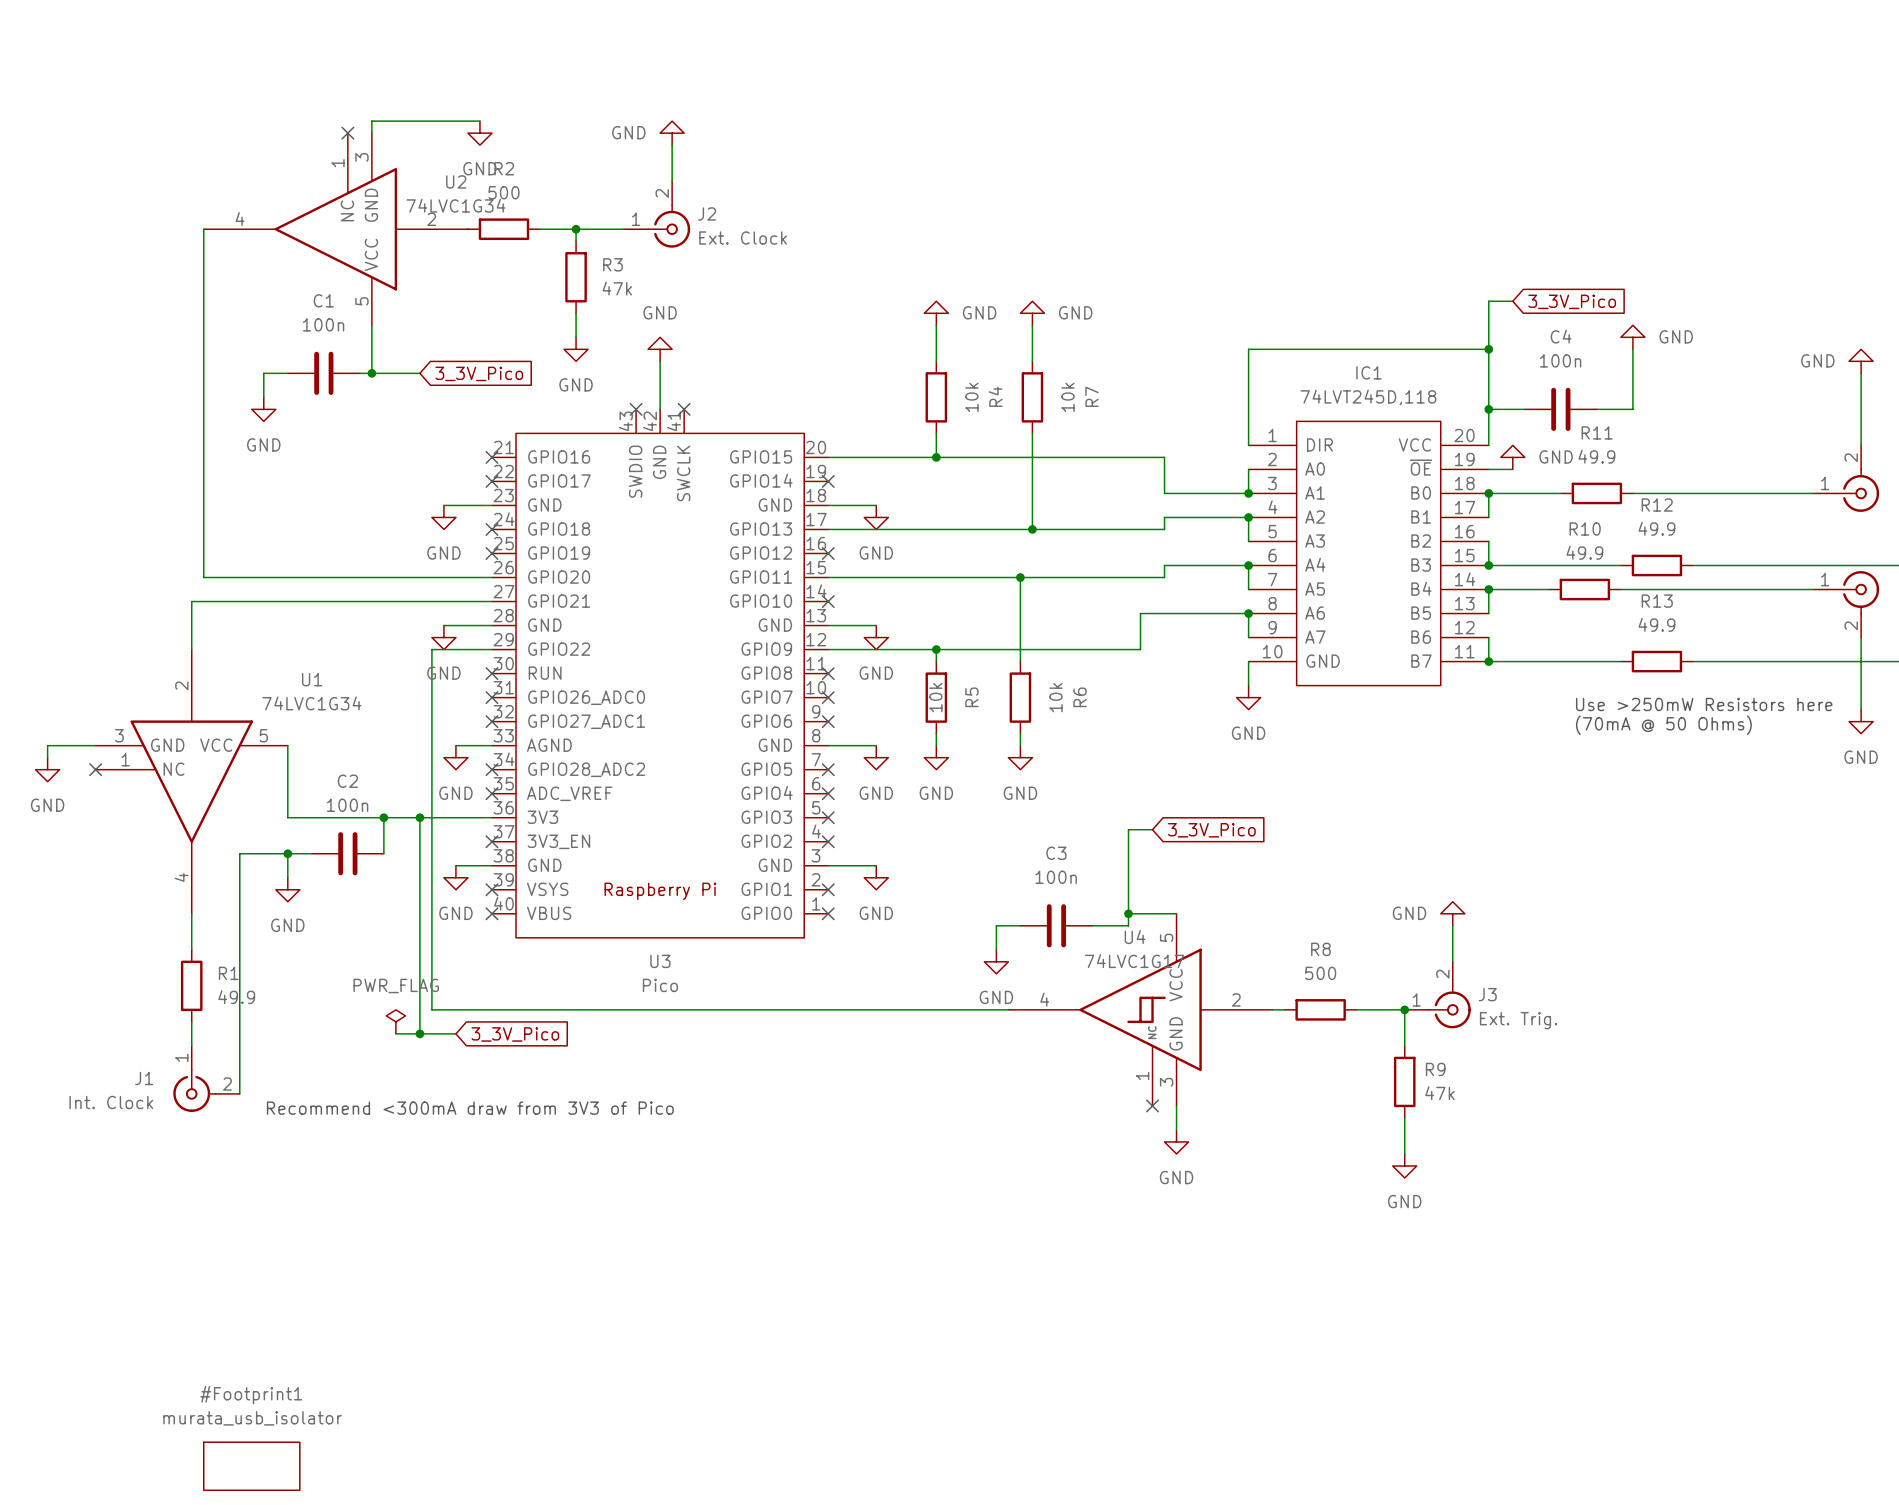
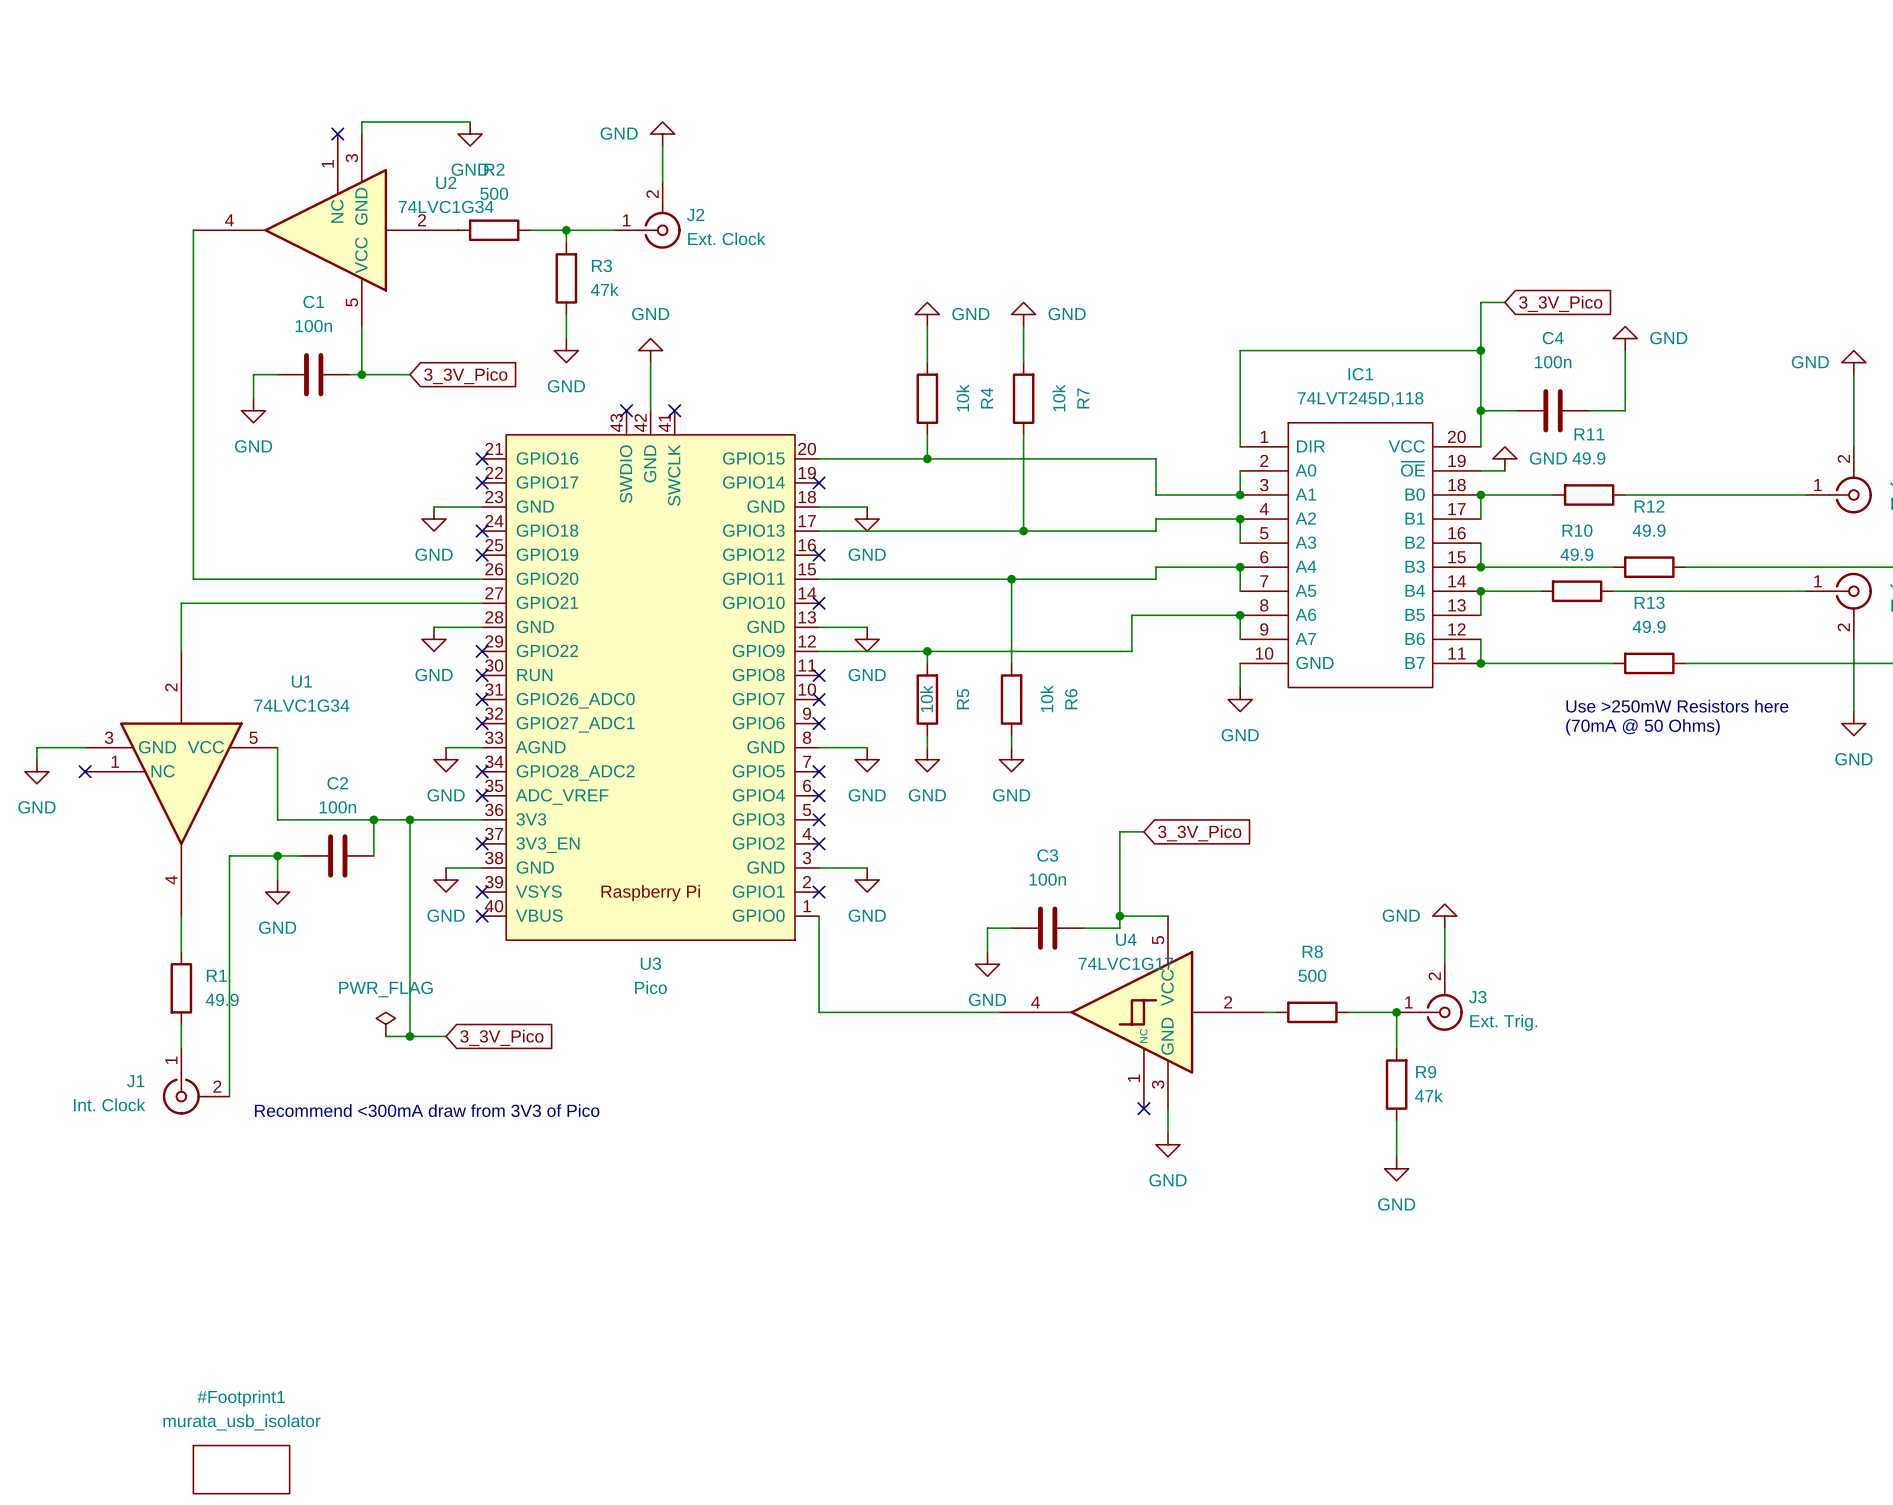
wire: (491, 649) (431, 649) (431, 1009) (828, 1009) -> (819, 916) (819, 1012)
no-connect mark: none -> (482, 651)
no-connect mark: (828, 913) -> none

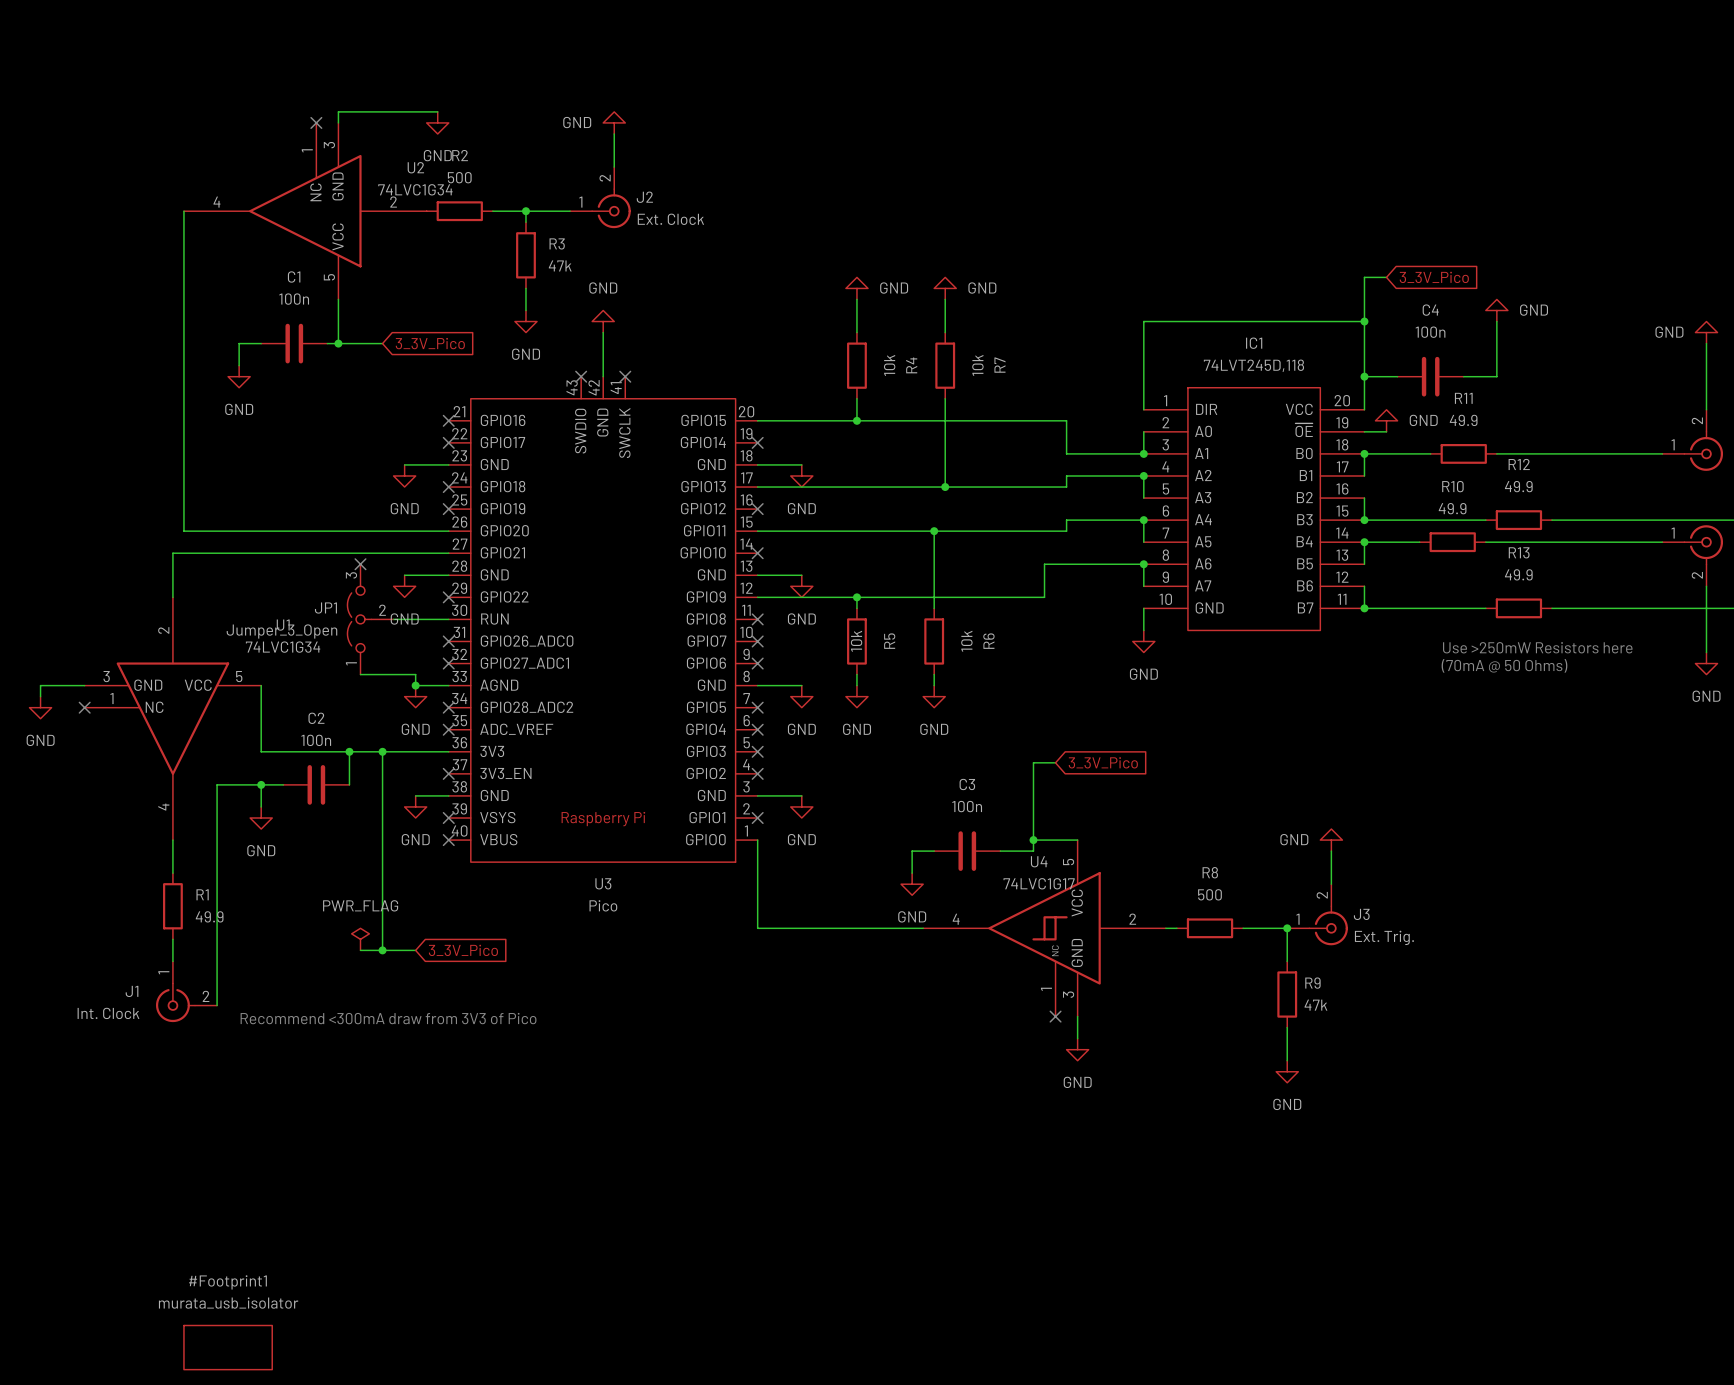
no-connect mark: none -> (360, 564)
JP1: none -> Jumper_3_Open (370, 619)
wire: none -> (393, 619) (448, 619)
no-connect mark: (482, 675) -> none
wire: none -> (360, 674) (415, 674) (415, 685)
junction: none -> (415, 685)

